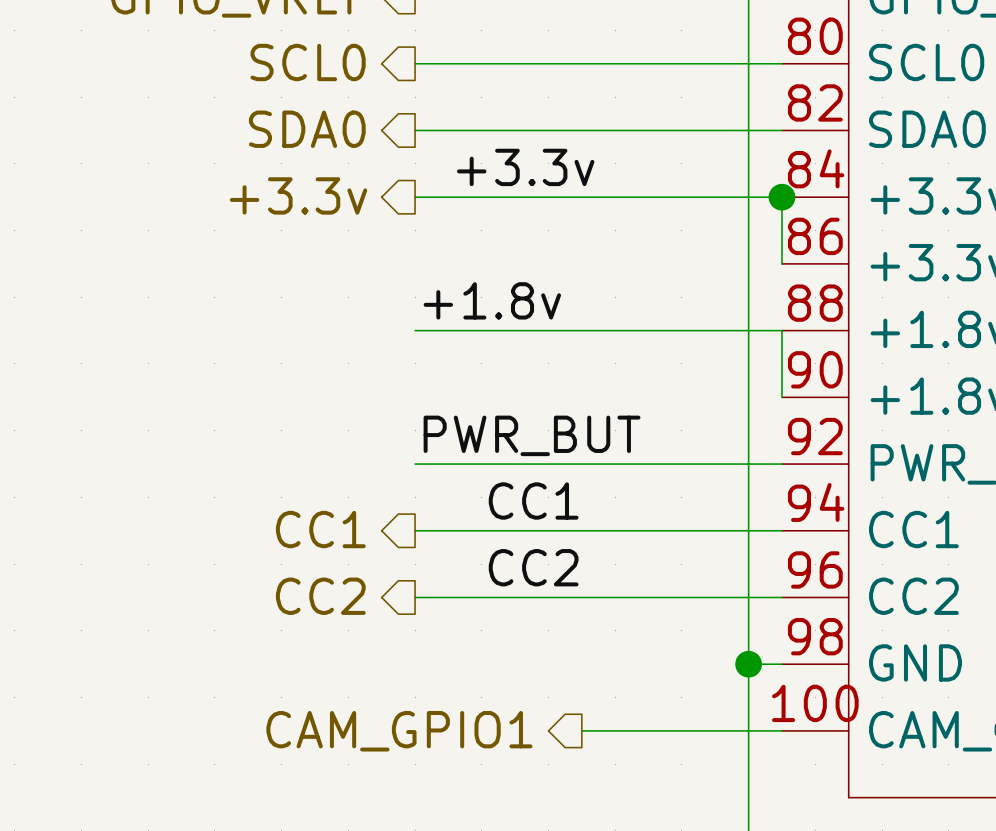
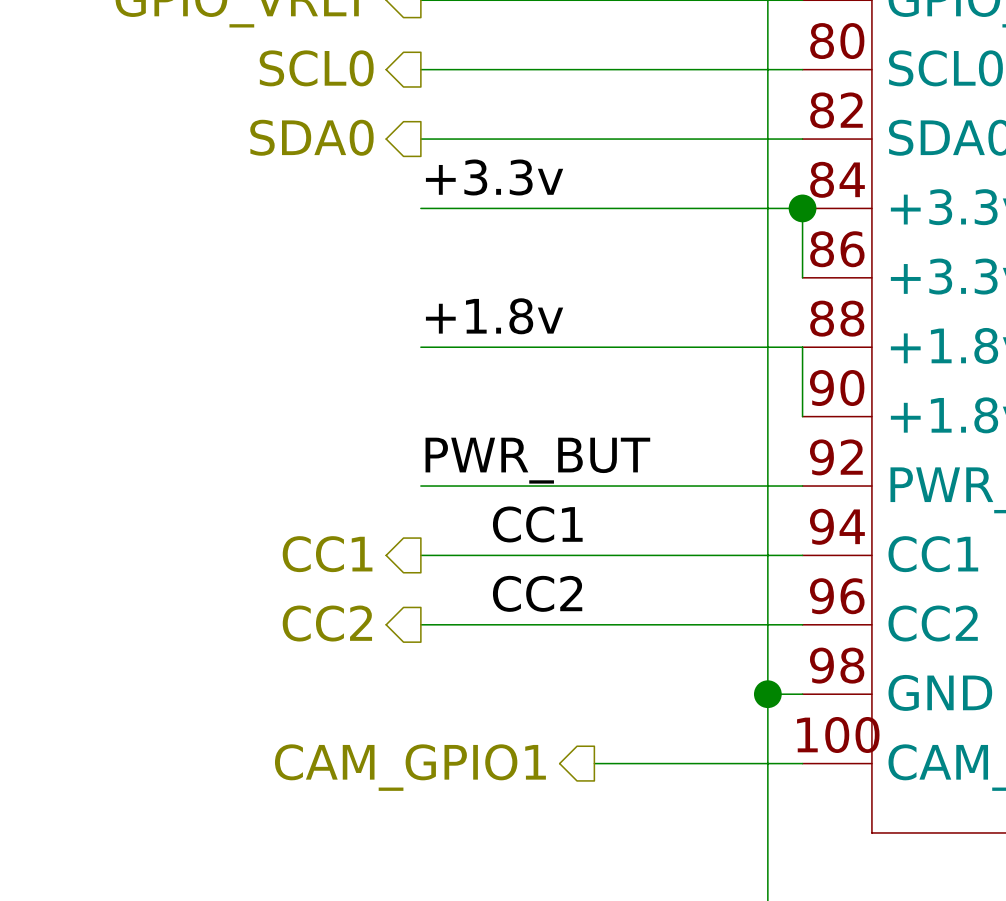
label position: +3.3v (525, 167) -> +3.3v (494, 177)
hierarchical label: +3.3v (298, 195) -> none

